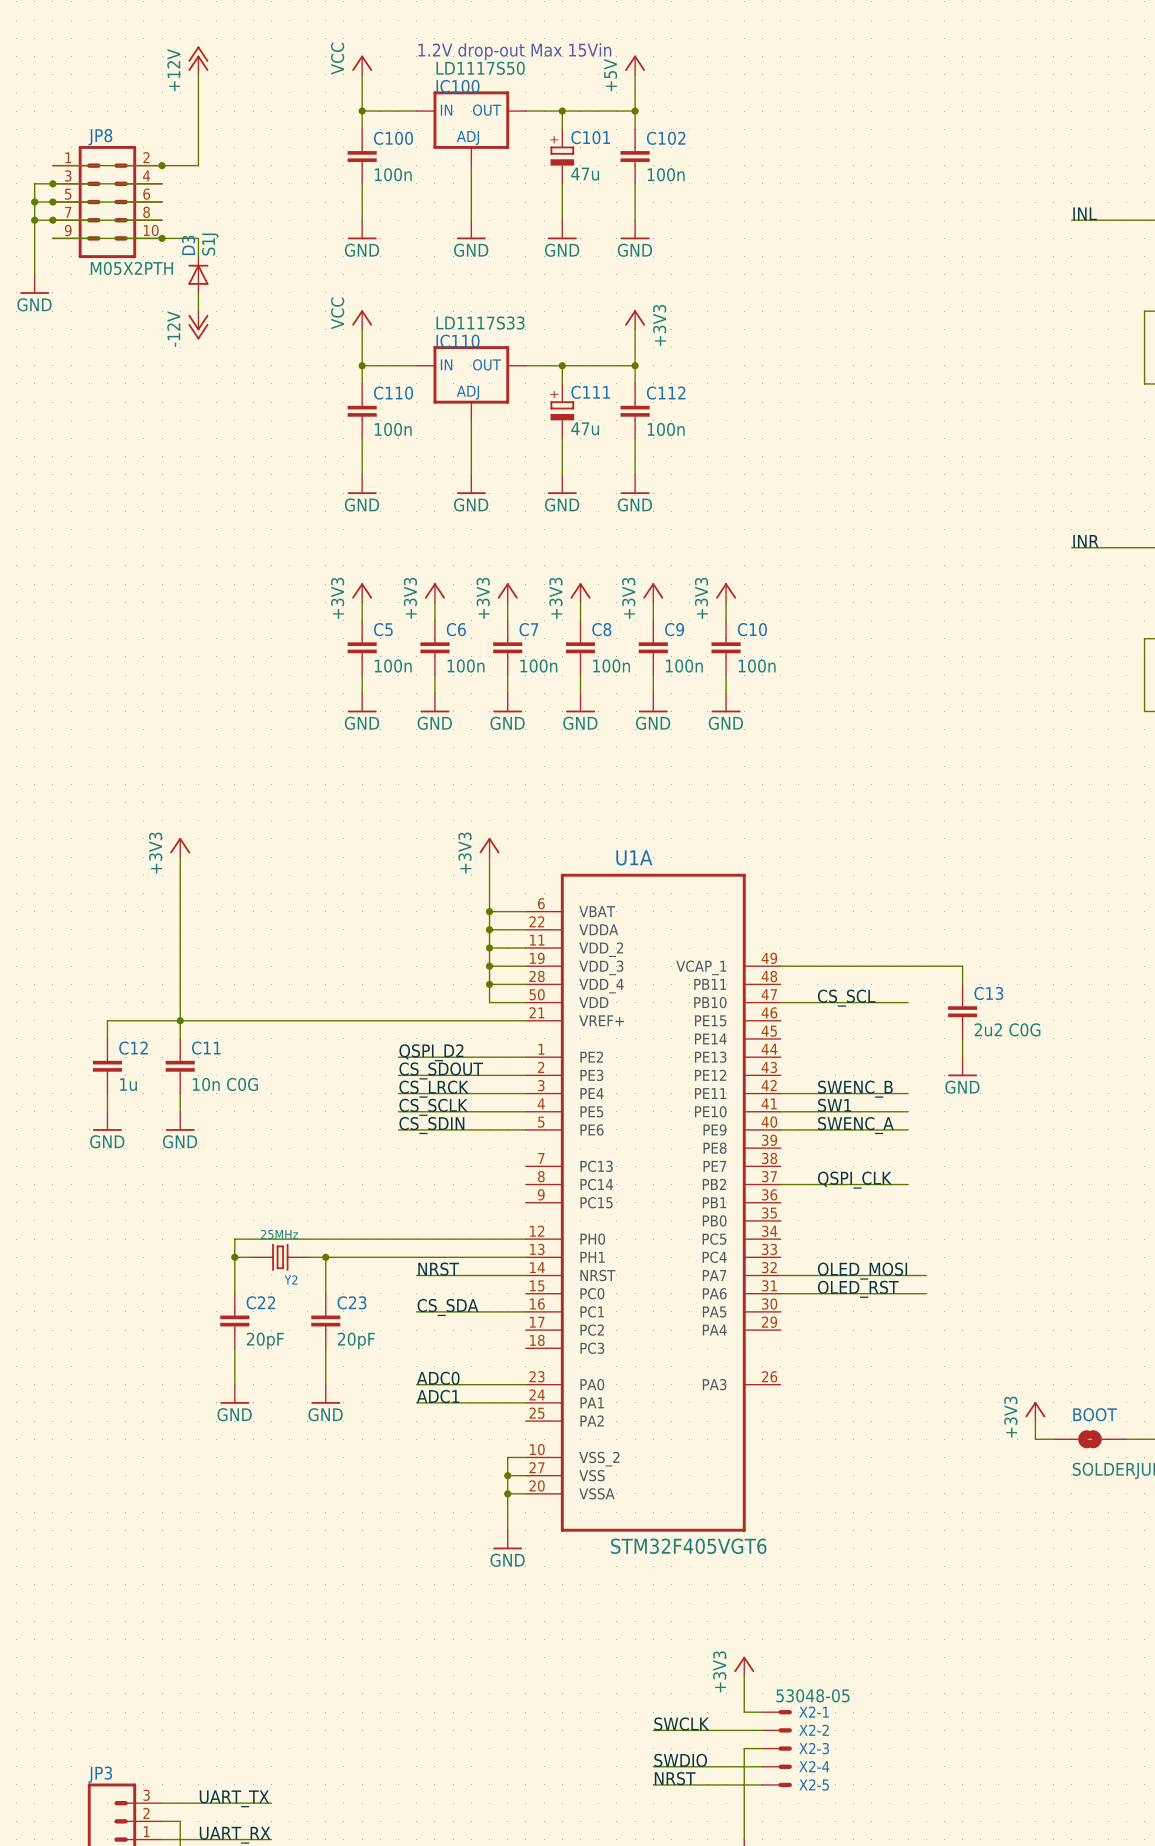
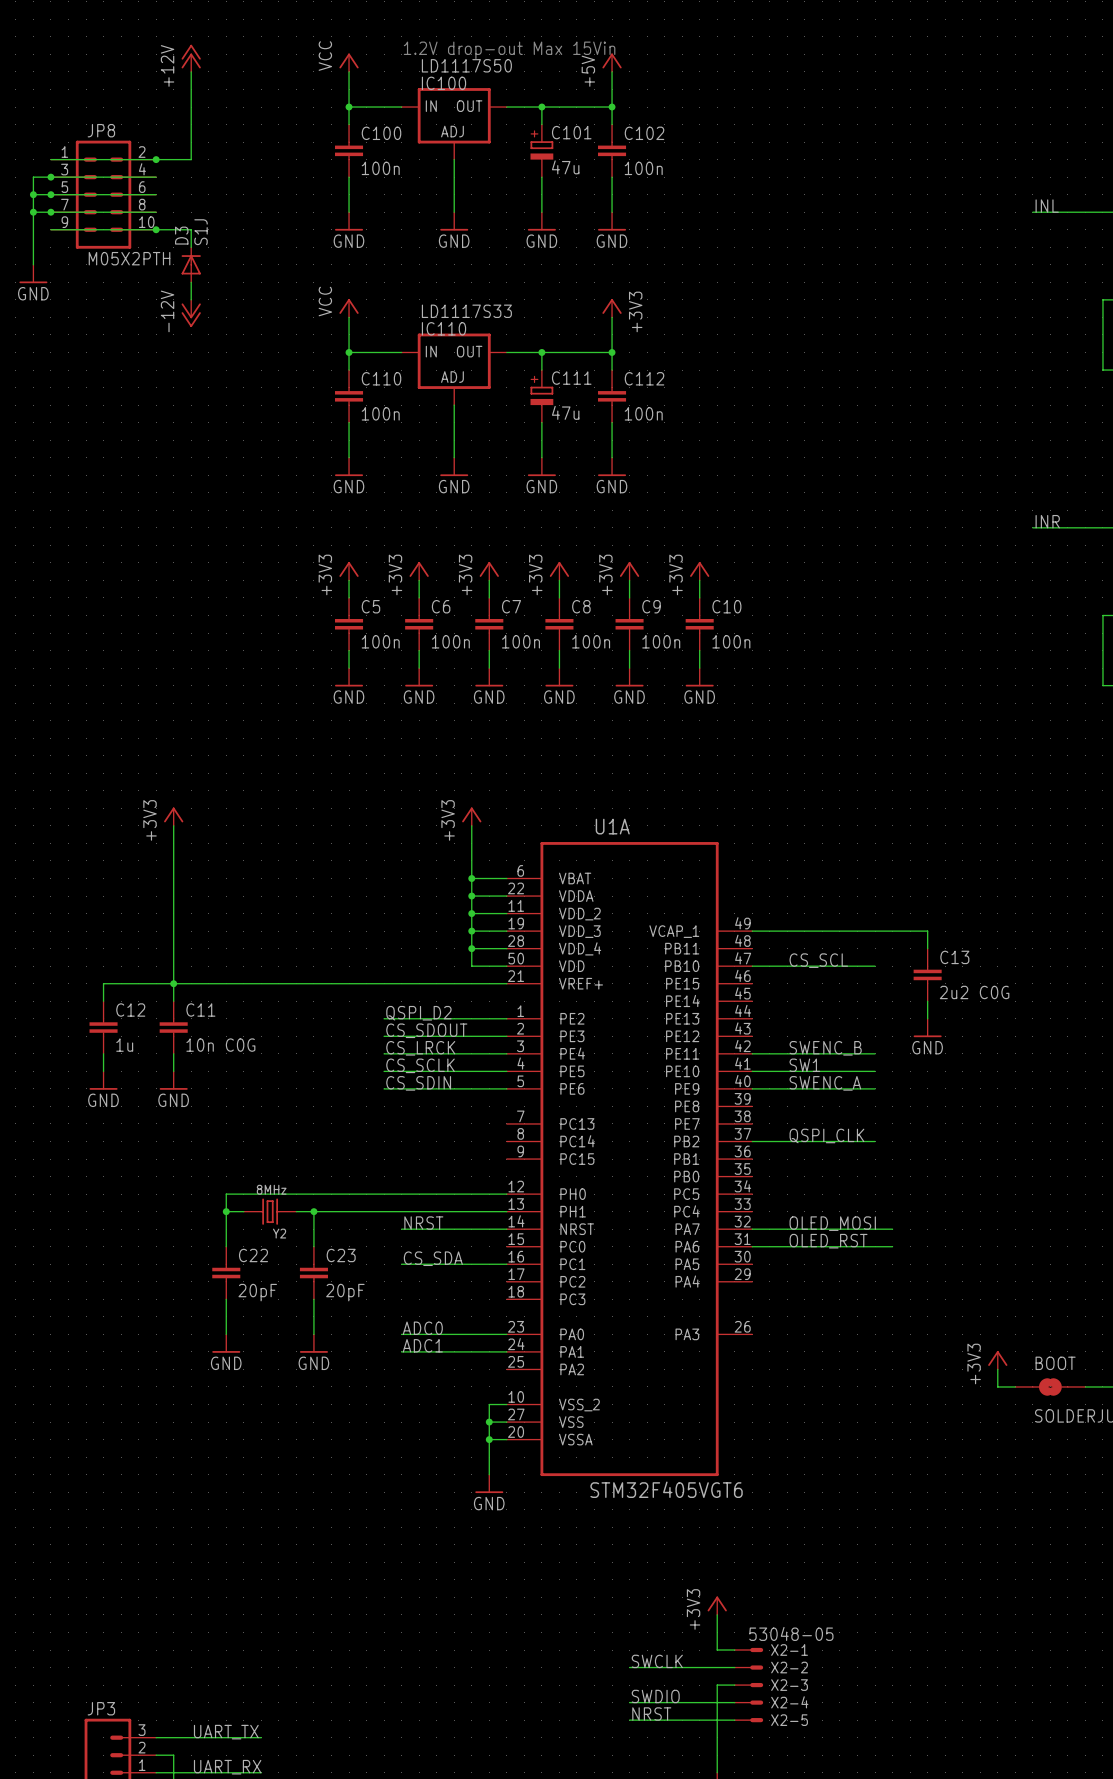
Y2 value: 25MHz (279, 1234) -> 8MHz (271, 1189)

